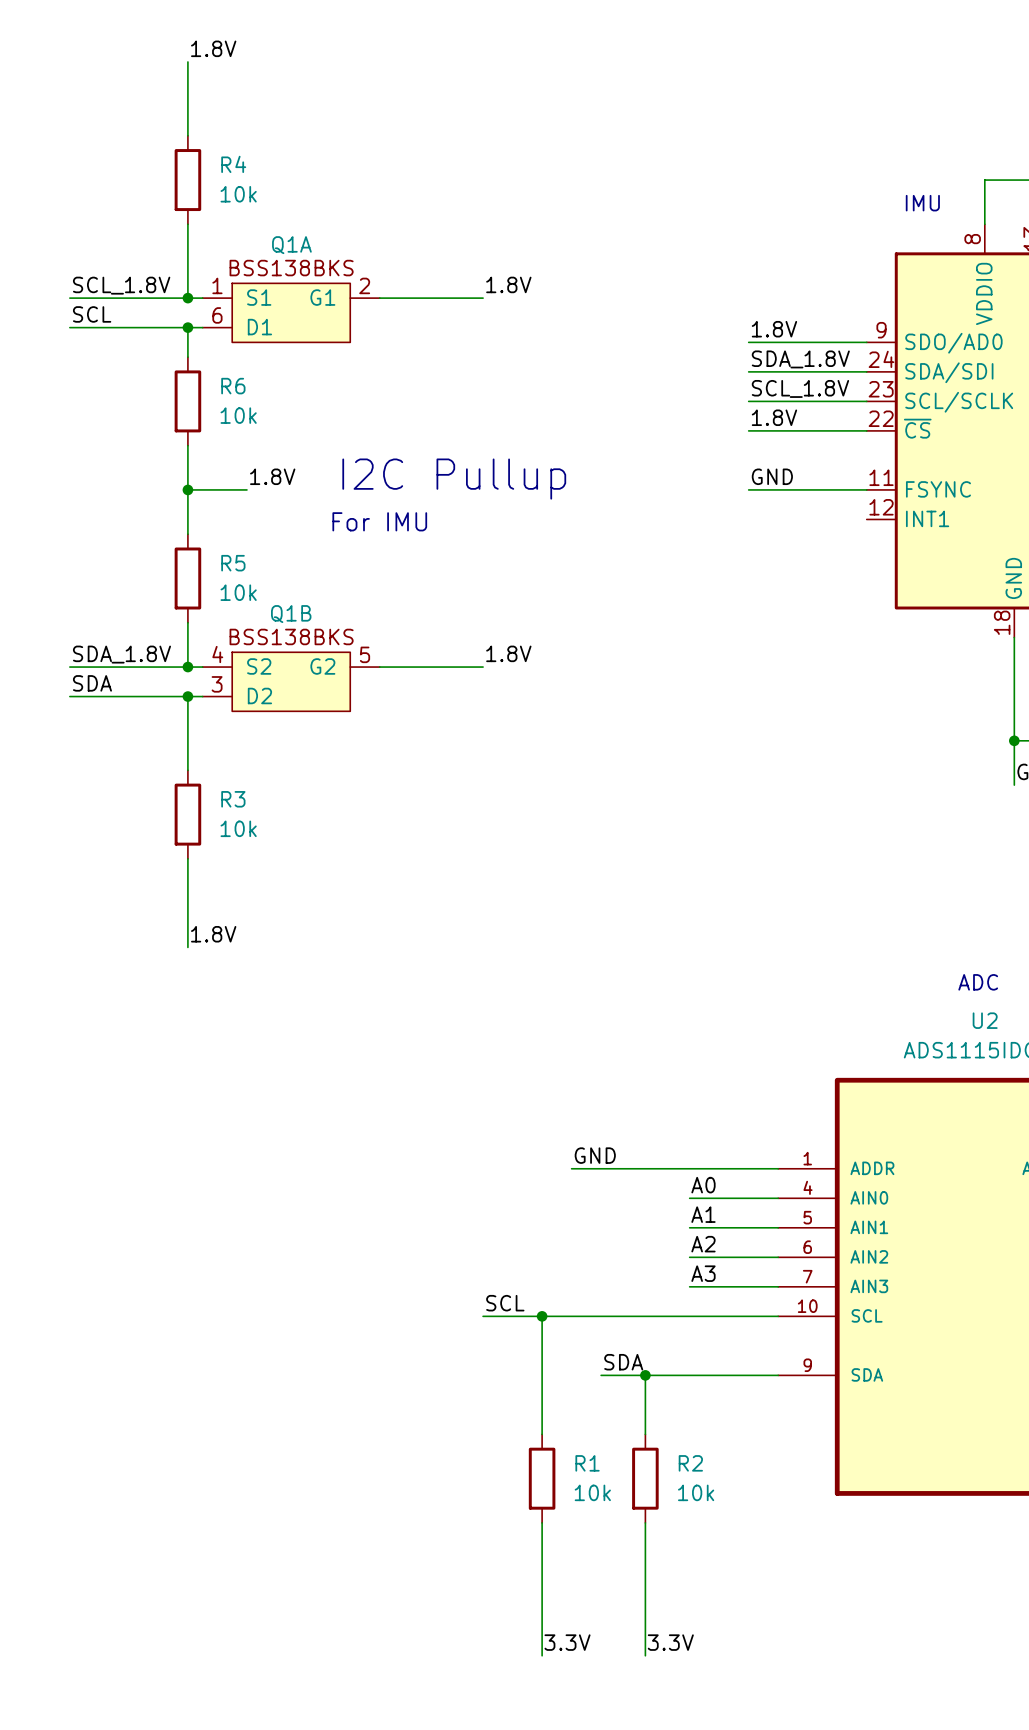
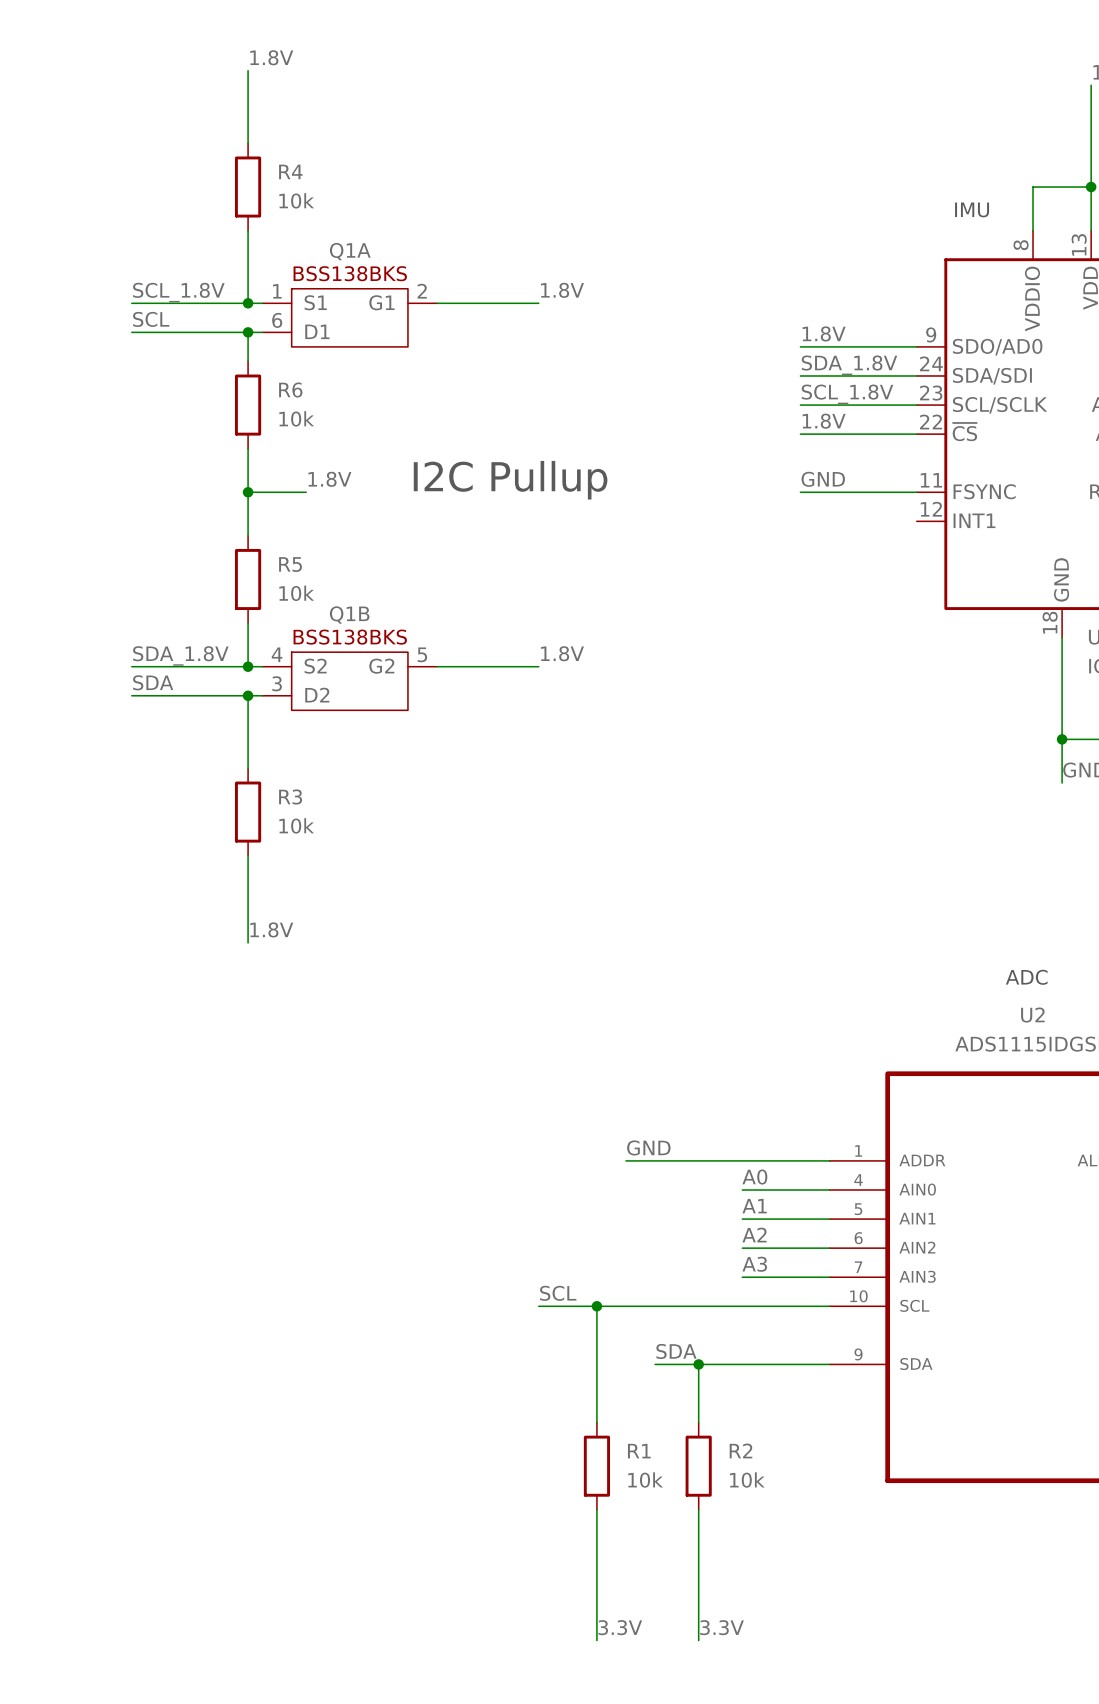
text: For IMU (379, 521) -> none

